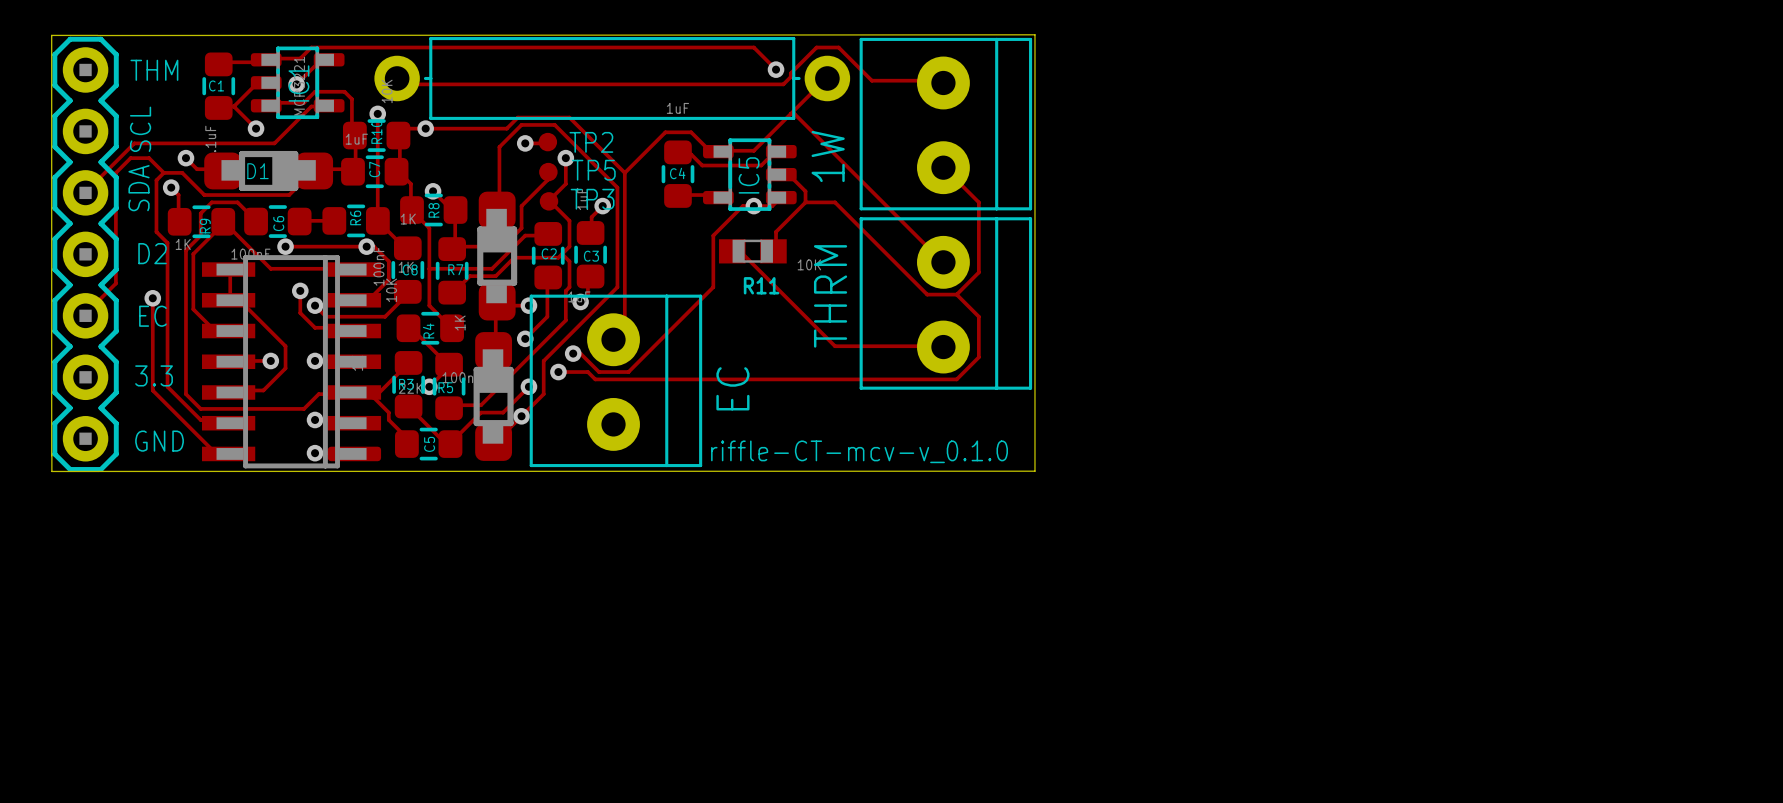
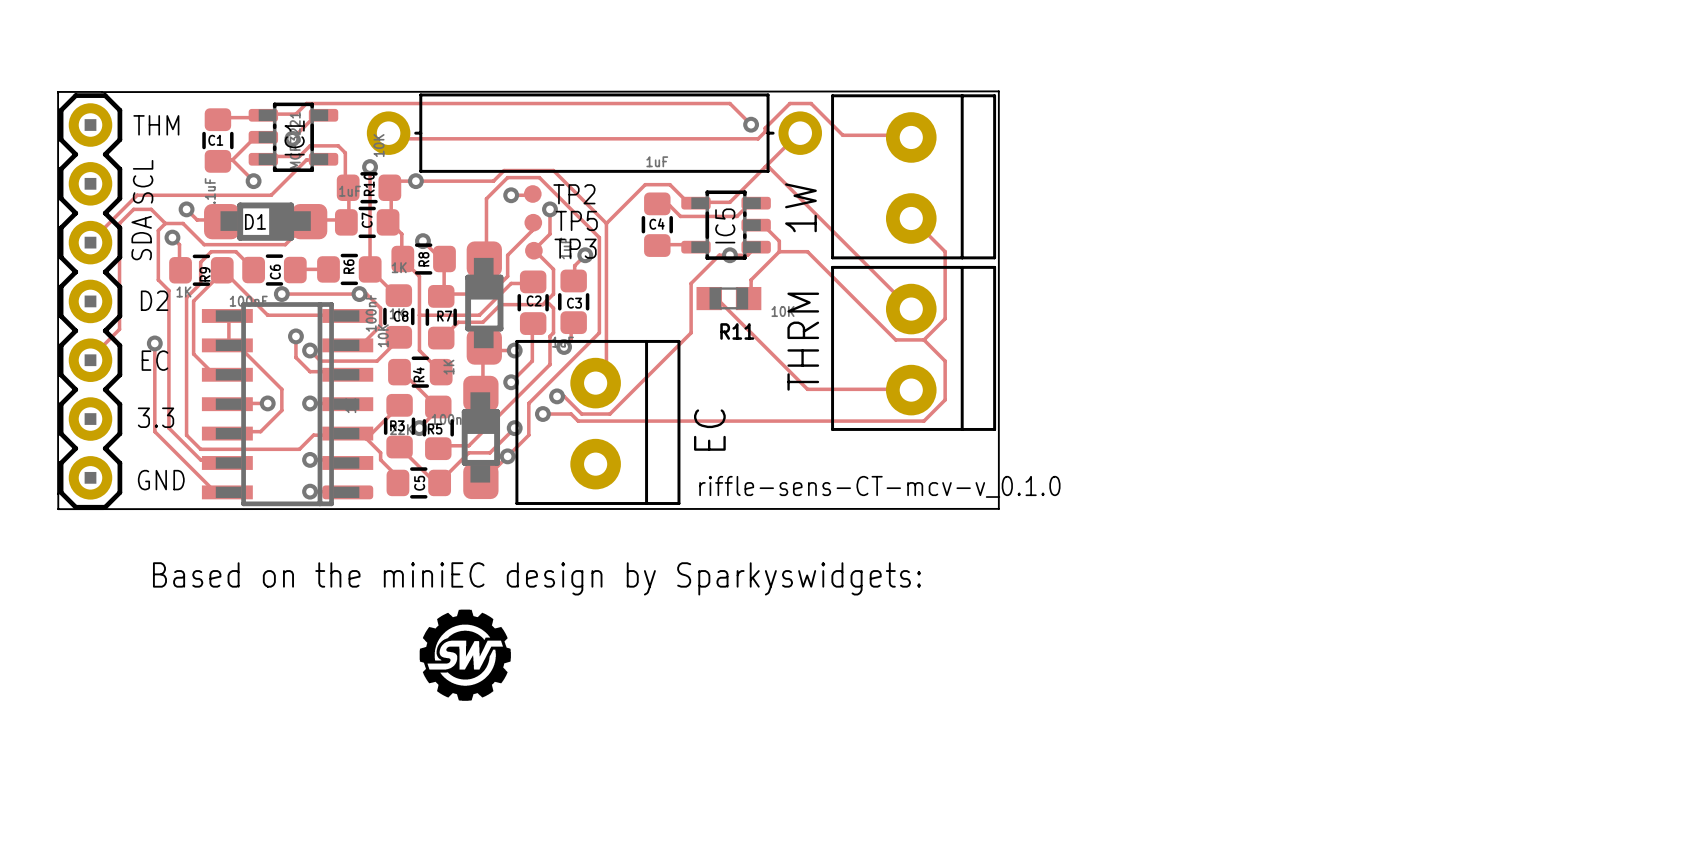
text: riffle-CT-mcv-v_0.1.0 (859, 451) -> riffle-sens-CT-mcv-v_0.1.0 (879, 486)
text: none -> Based on the miniEC design by Sparkyswidgets: (536, 578)
drawing: none -> [419, 609, 511, 701]

